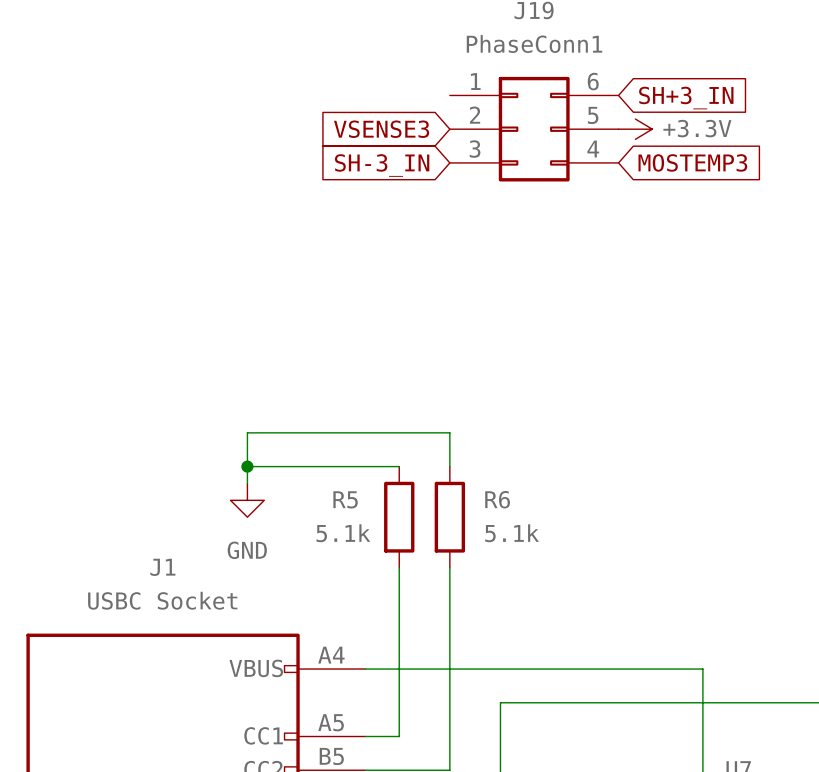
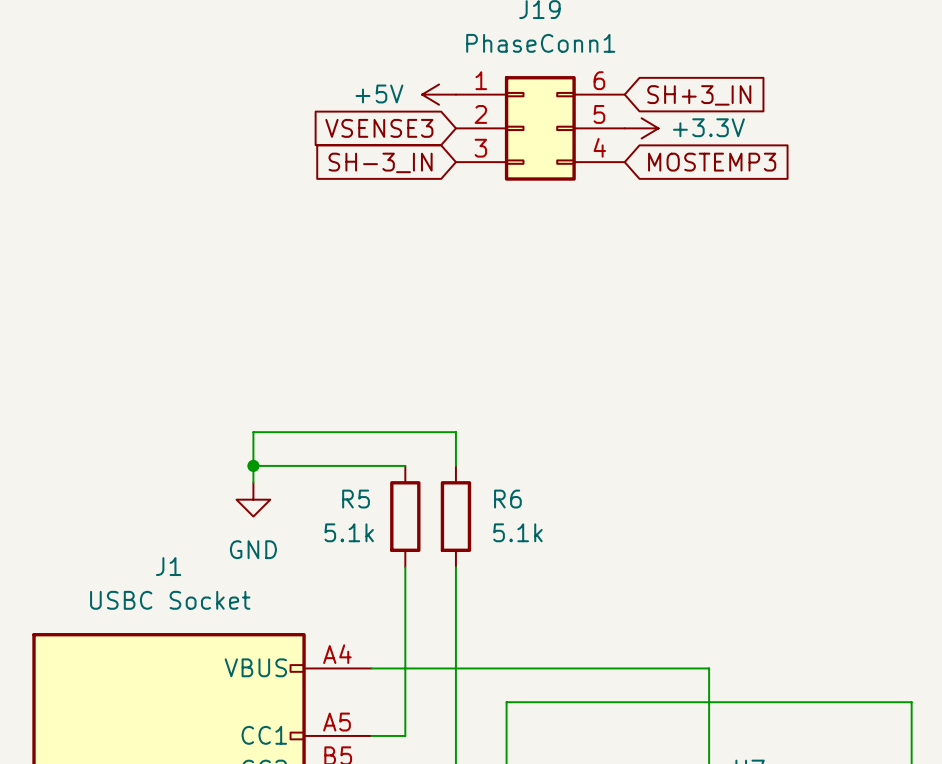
power symbol: none -> +5V (439, 94)

